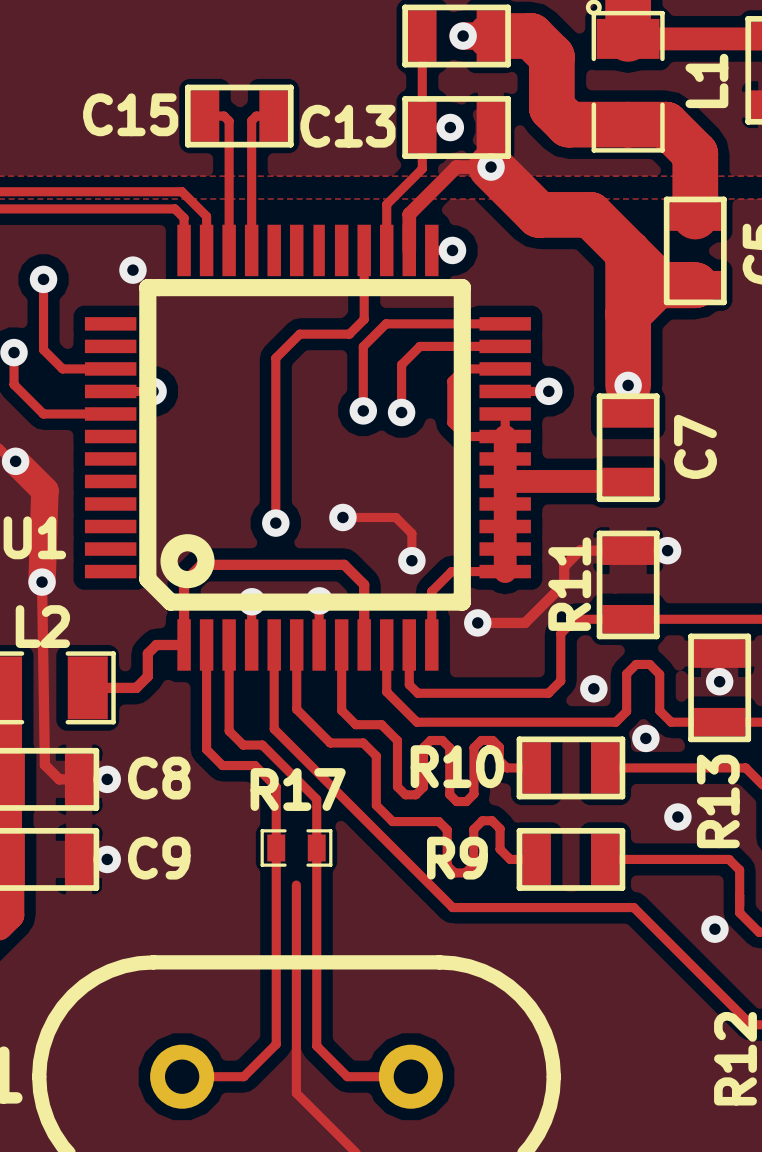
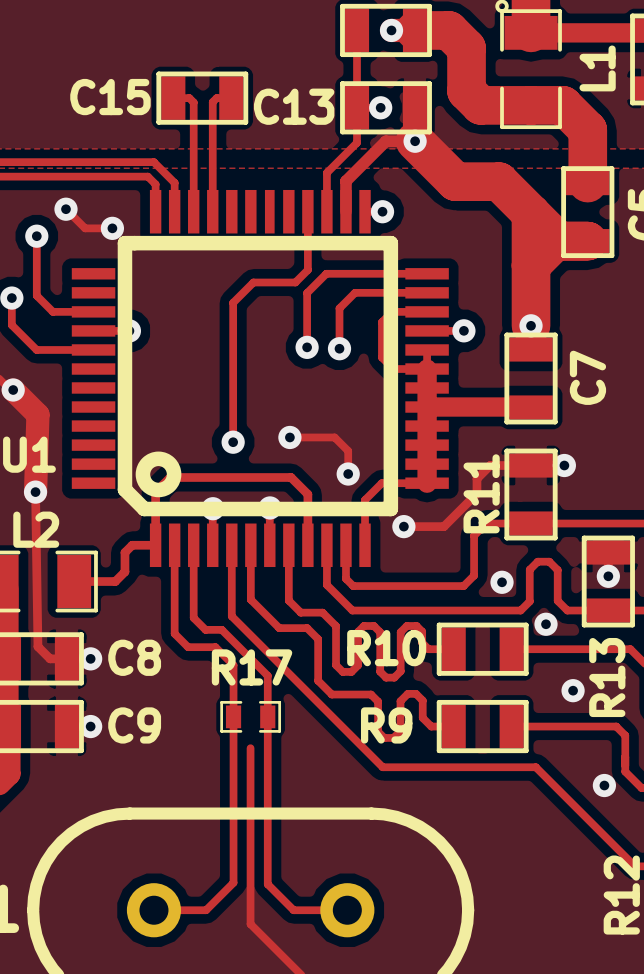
track: none -> (65, 209) (85, 228) (112, 228)
via: none -> (65, 209)

